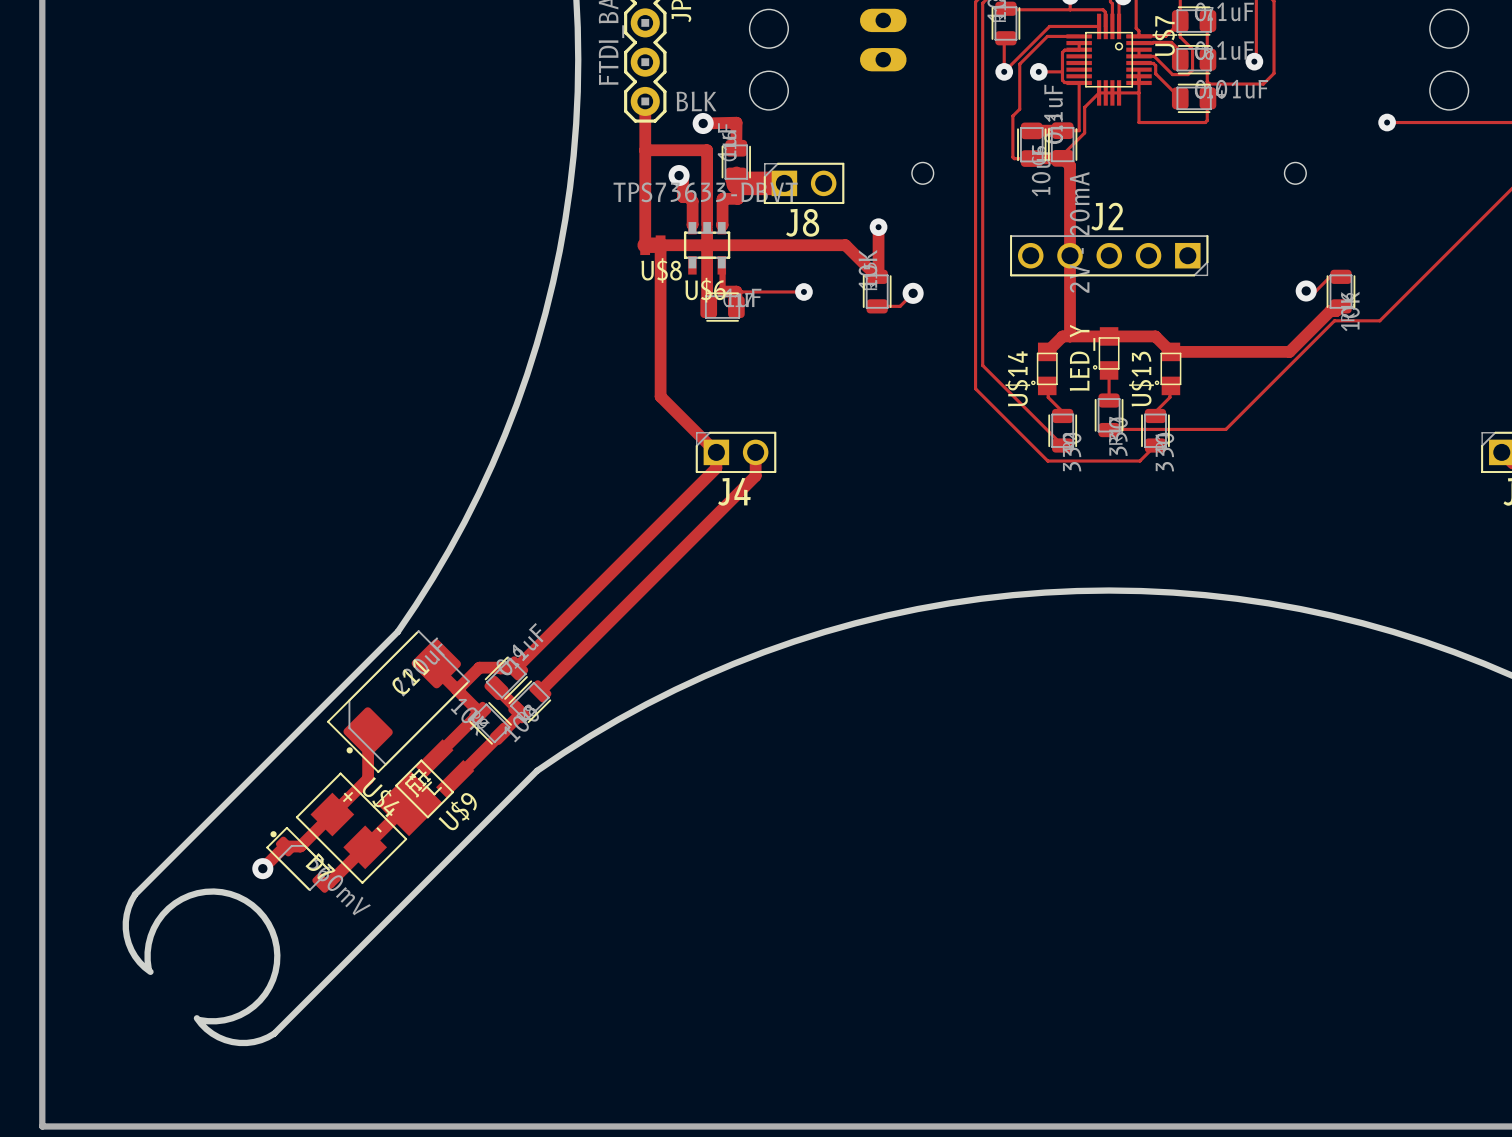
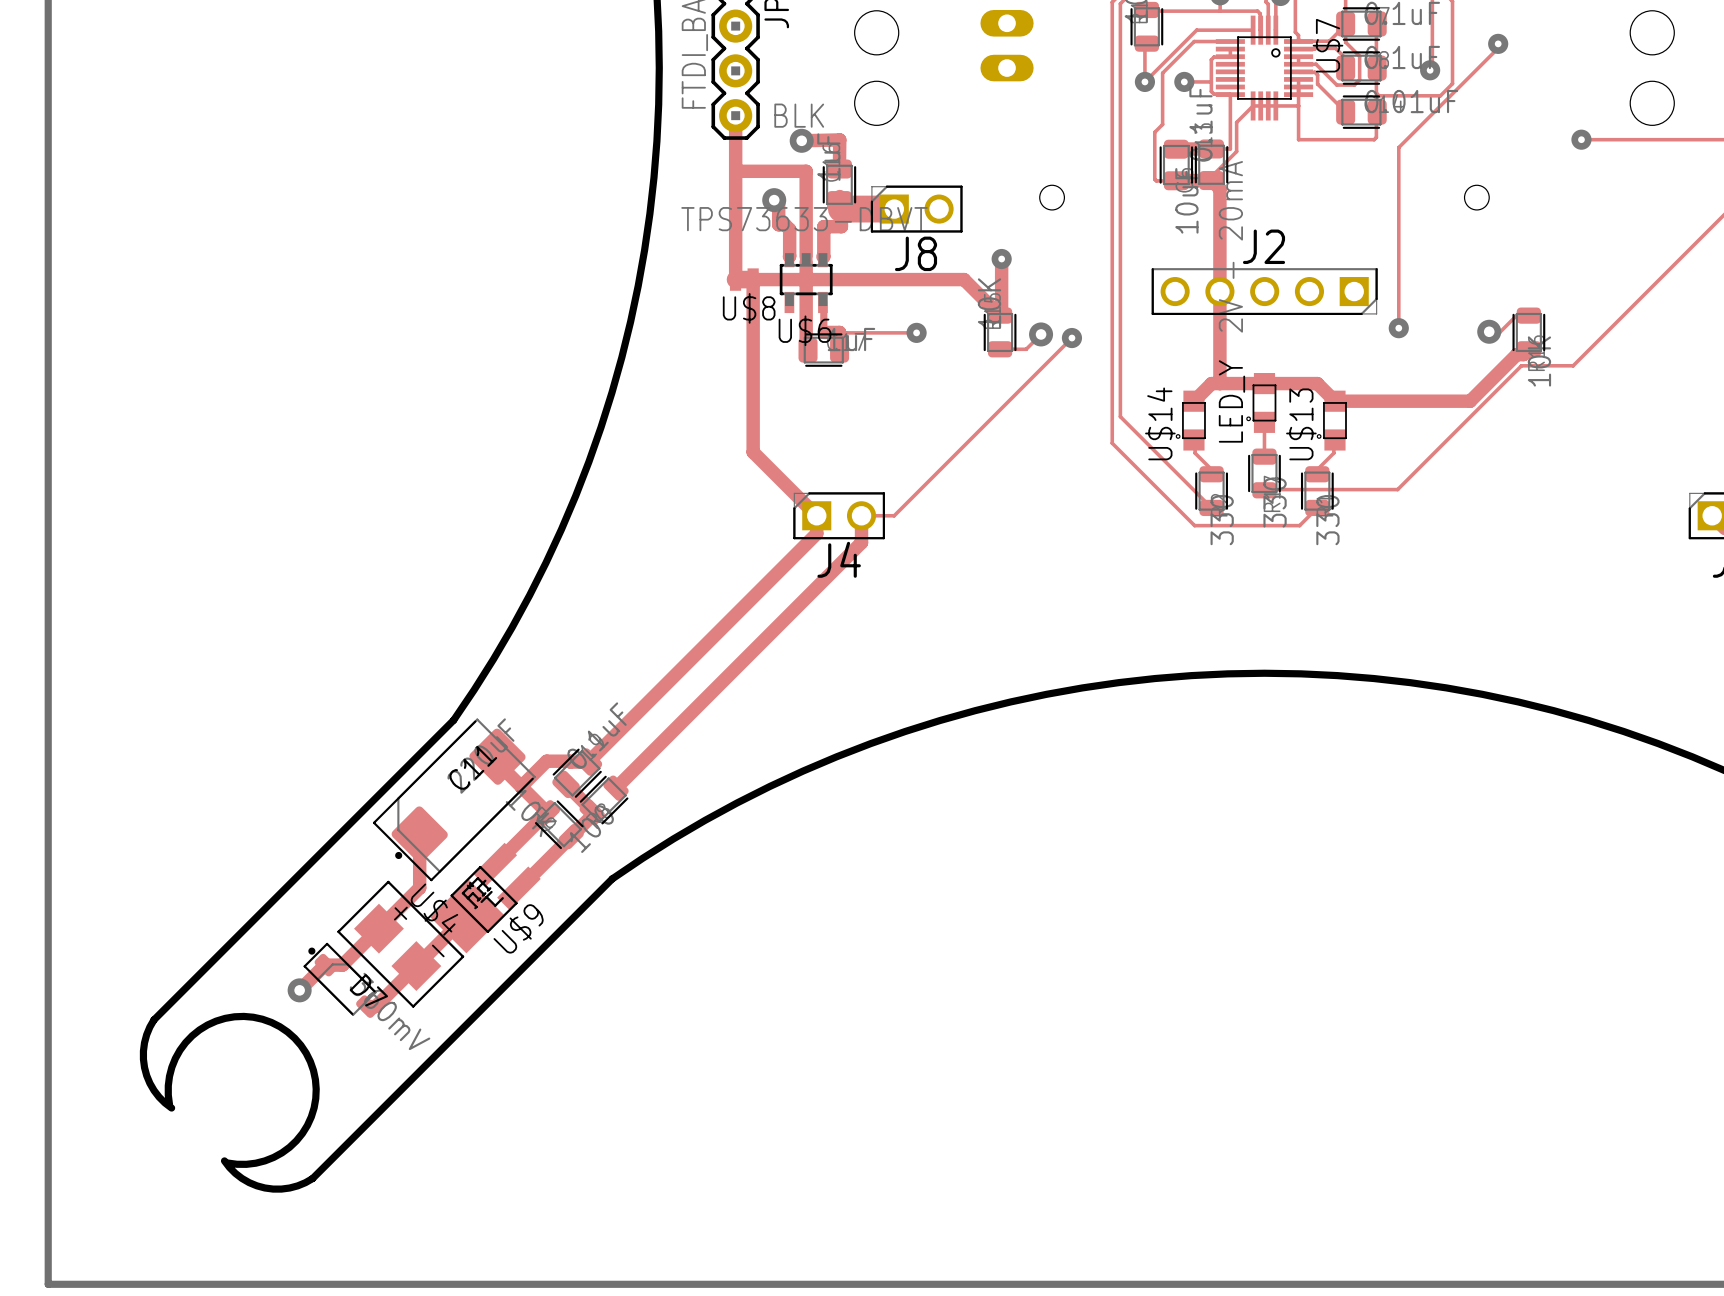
track: none -> (1498, 43) (1498, 48) (1398, 147) (1398, 328)
via: none -> (1498, 43)
via: none -> (1398, 328)
track: none -> (1071, 338) (894, 515) (861, 515) (867, 512)
via: none -> (1071, 338)

